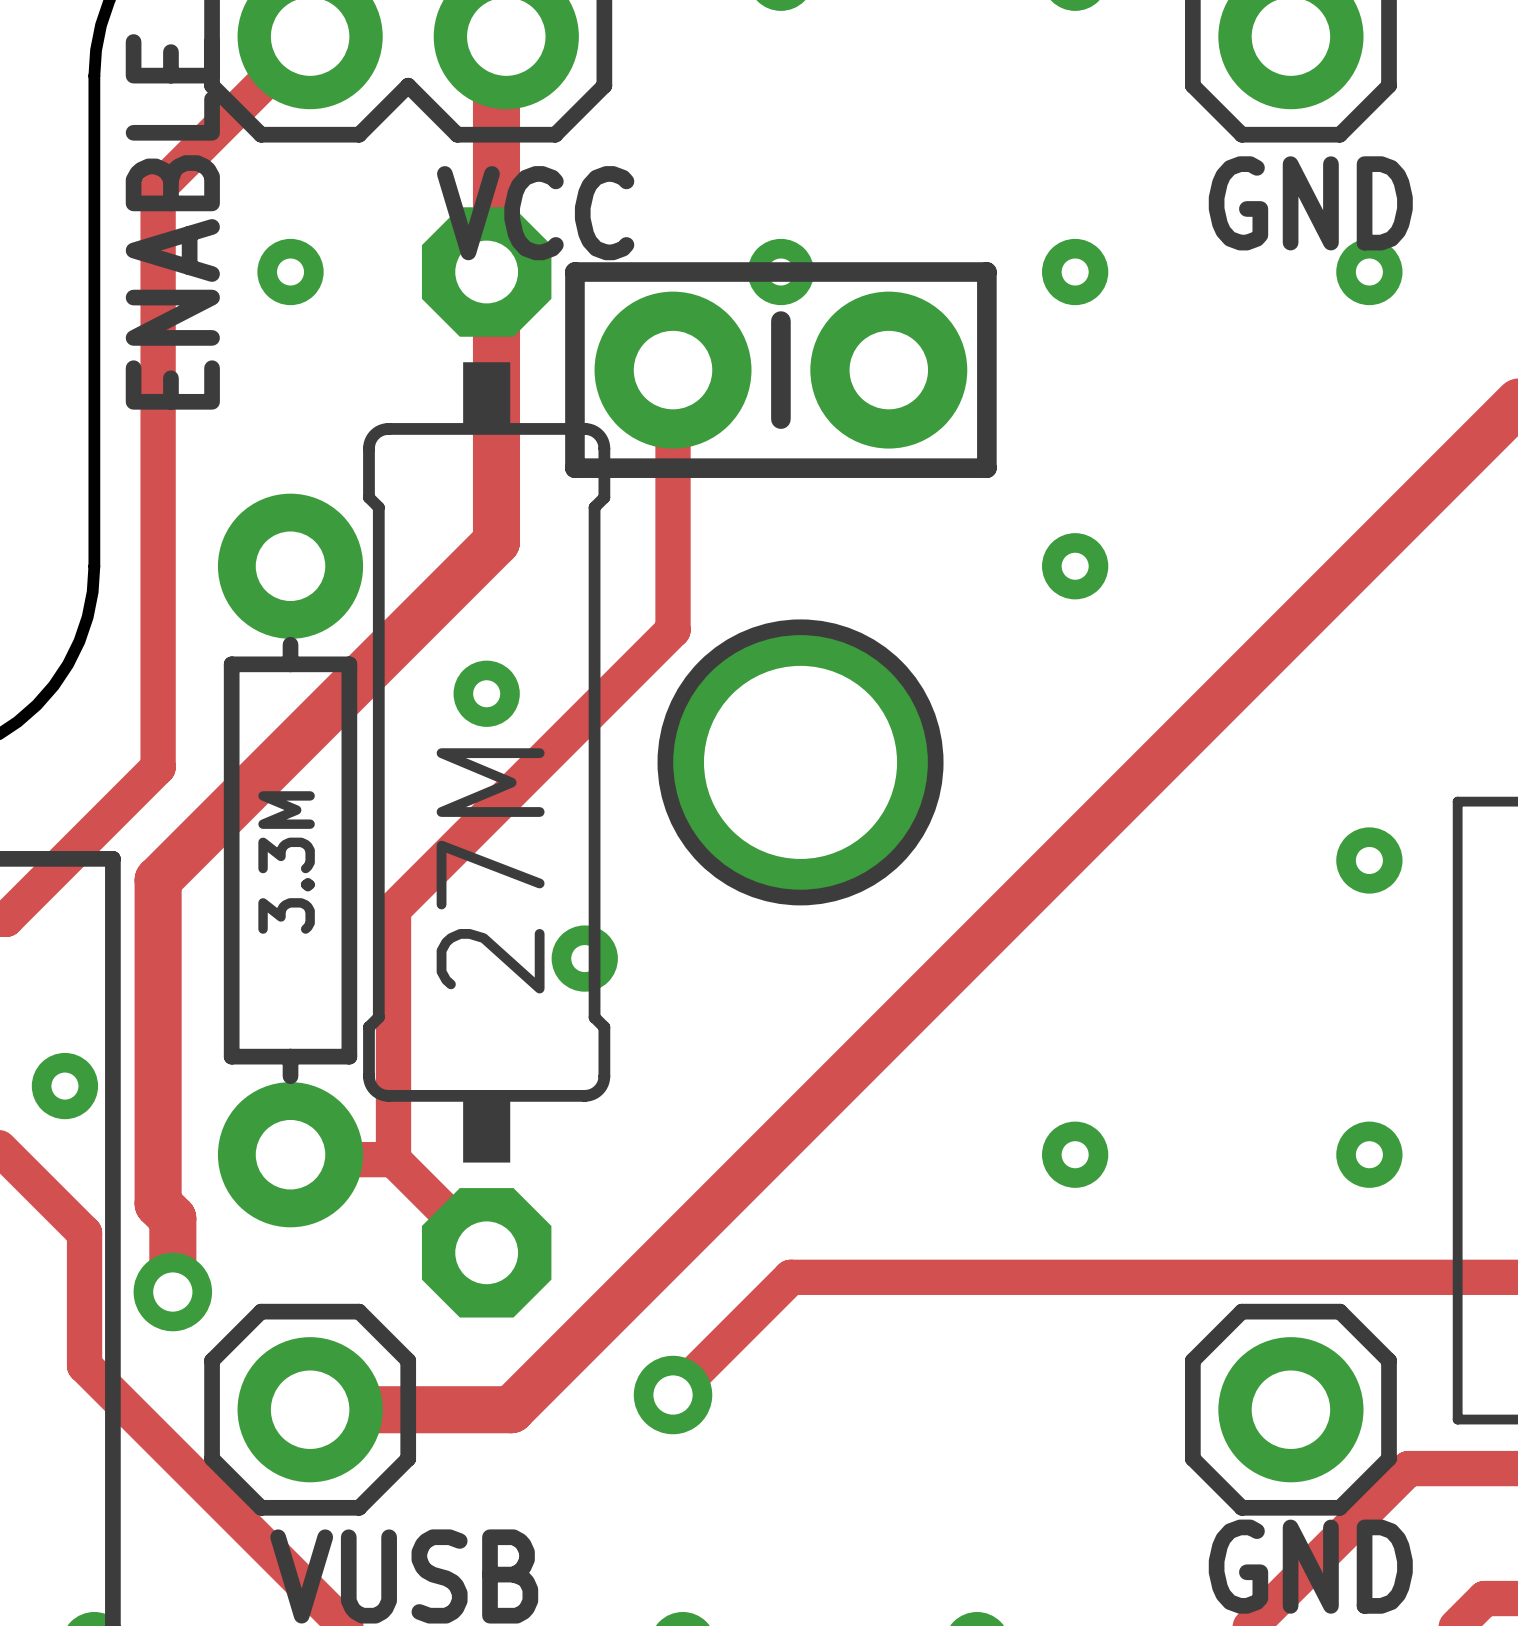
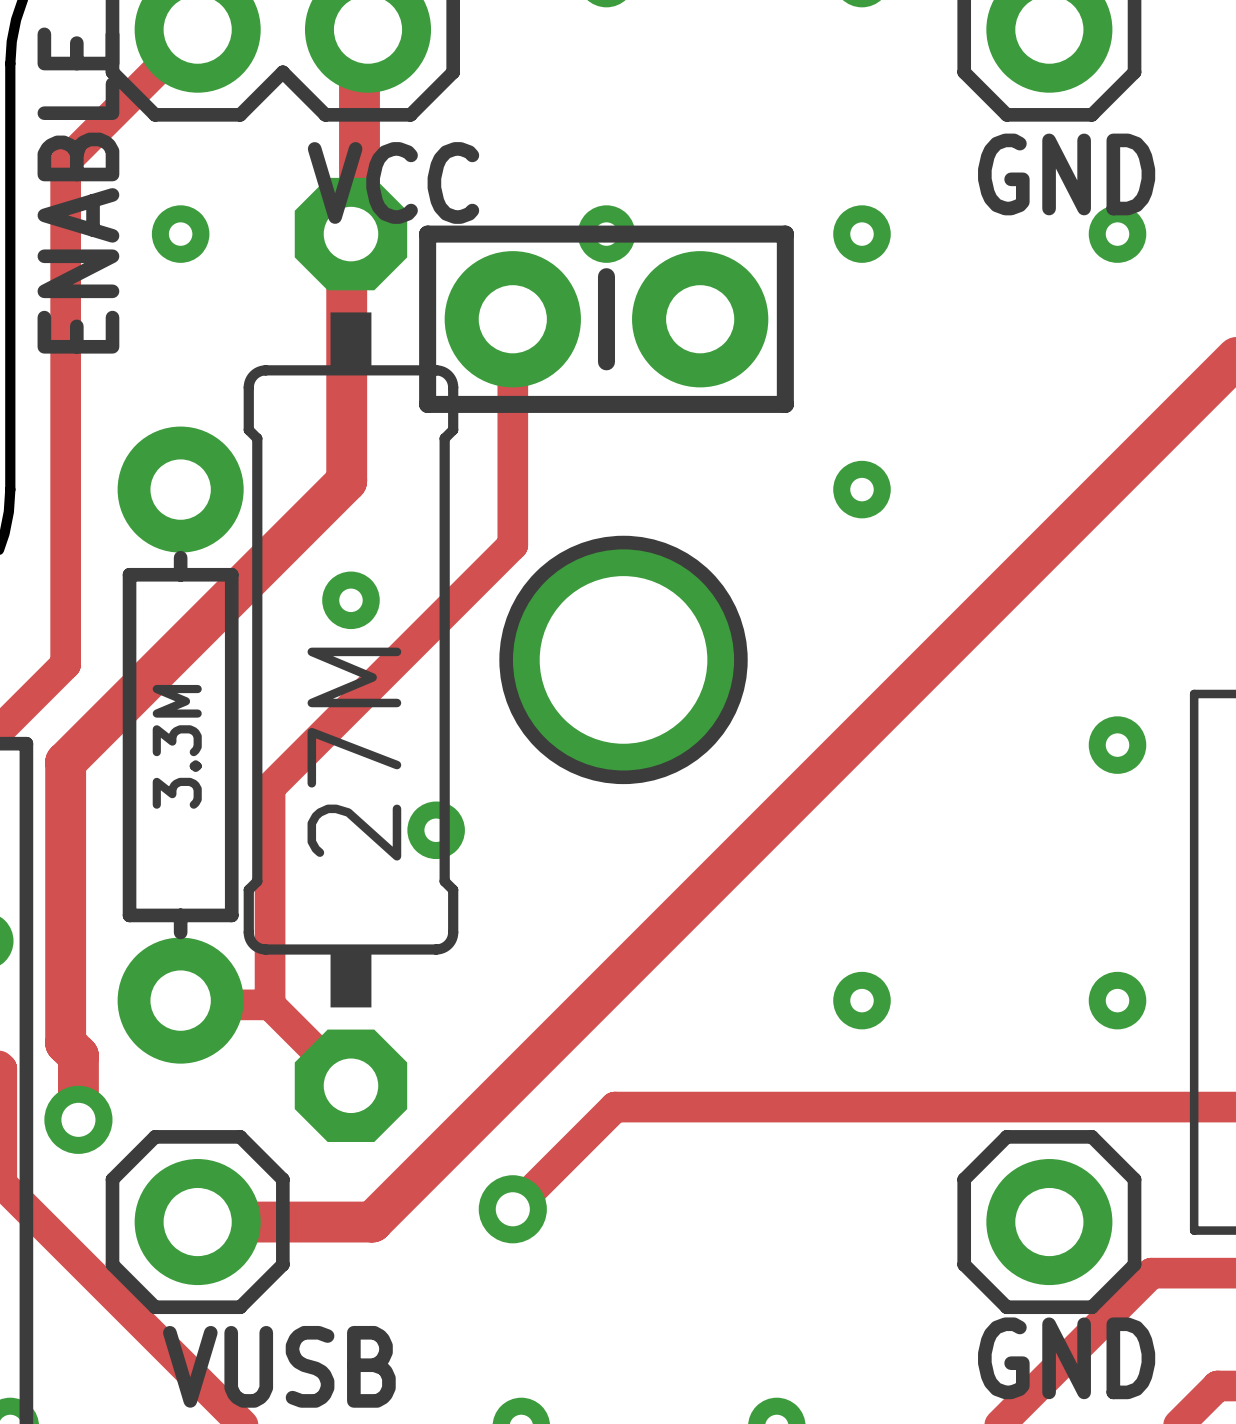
track: (486, 272) (496, 291) (496, 541) (481, 556) -> (350, 234) (346, 251) (346, 481)

